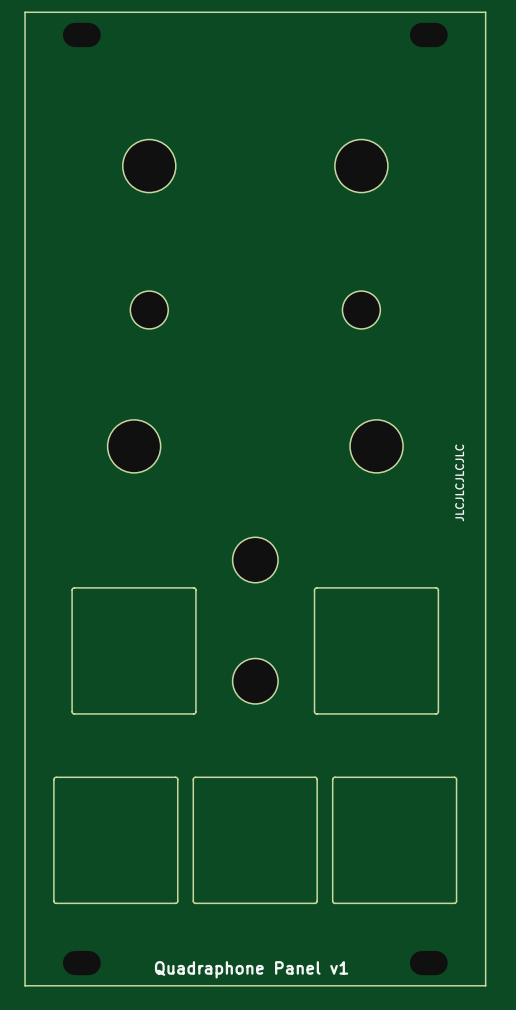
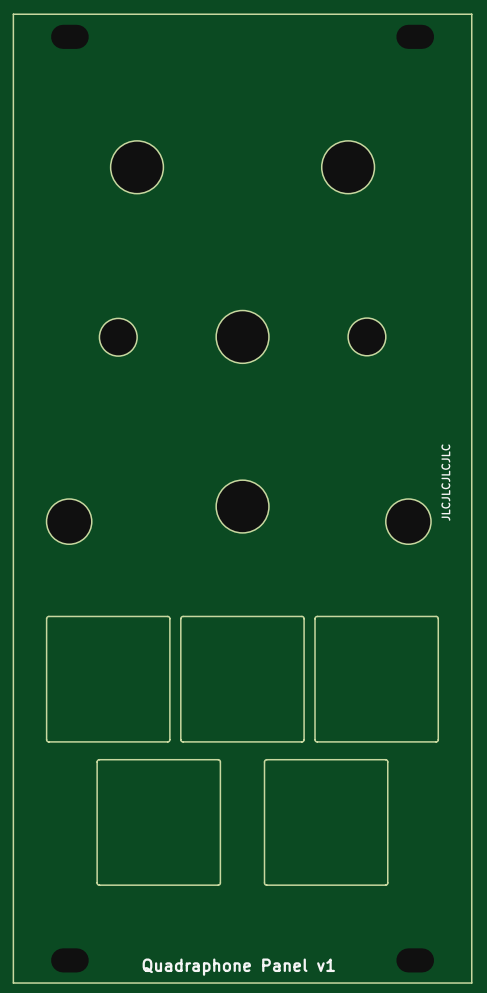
part position: (149, 310) -> (118, 337)
part position: (361, 310) -> (366, 336)
part: none -> (242, 336)
part: (134, 446) -> none
part: (376, 446) -> none
part: none -> (242, 506)
part: none -> (69, 521)
part: none -> (408, 521)
part: (255, 560) -> none
drawing: none -> [180, 616, 305, 743]
drawing position: (134, 650) -> (108, 679)
drawing position: (376, 650) -> (376, 679)
part: (255, 681) -> none
drawing: none -> [96, 759, 221, 886]
drawing: none -> [264, 759, 389, 886]
drawing: [53, 776, 179, 904] -> none
drawing: [192, 776, 318, 904] -> none
drawing: [332, 776, 458, 904] -> none

